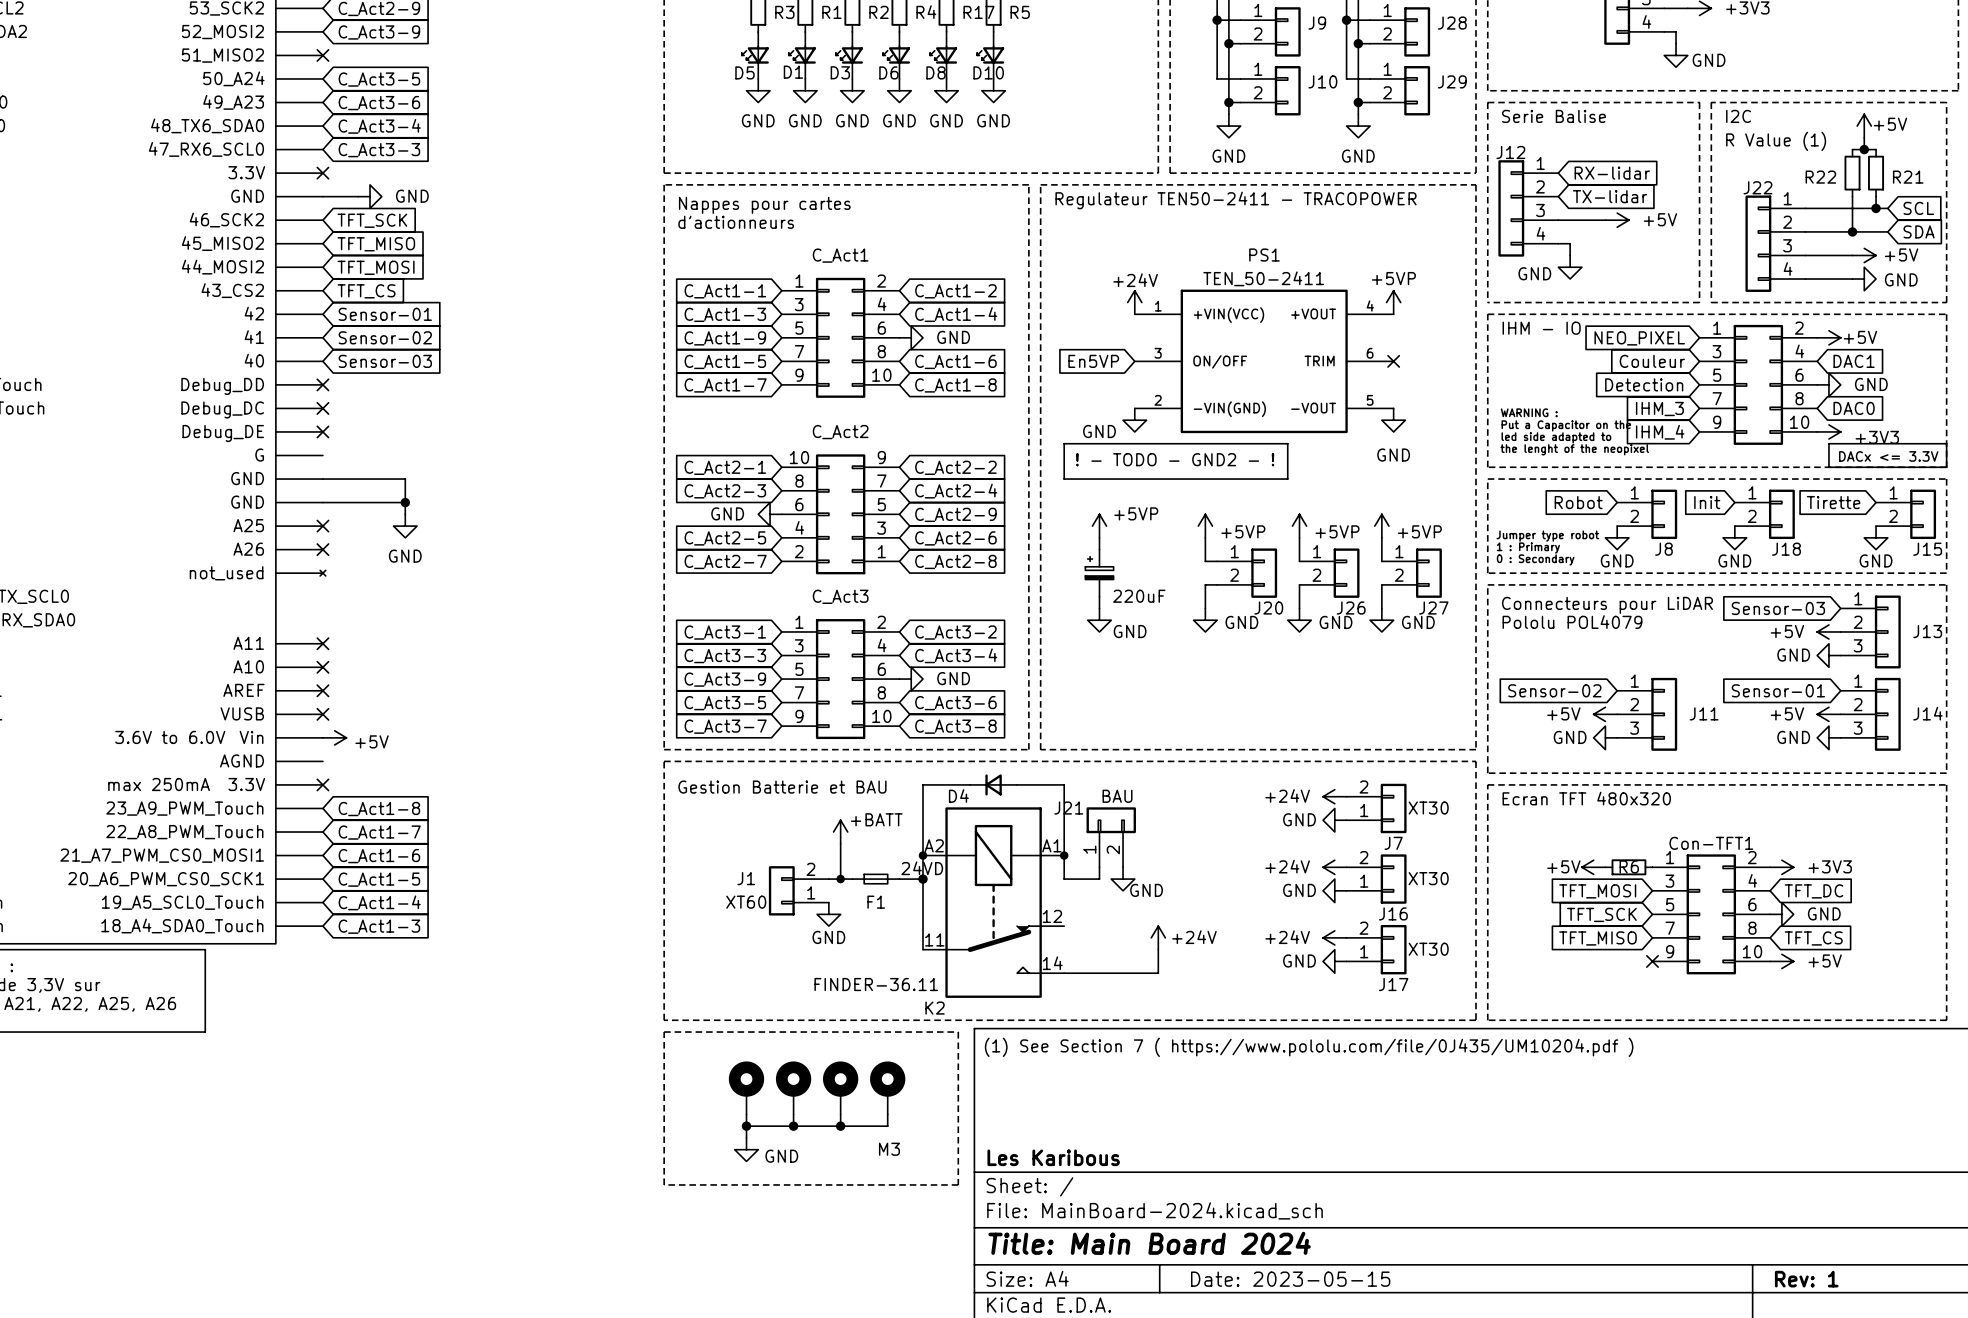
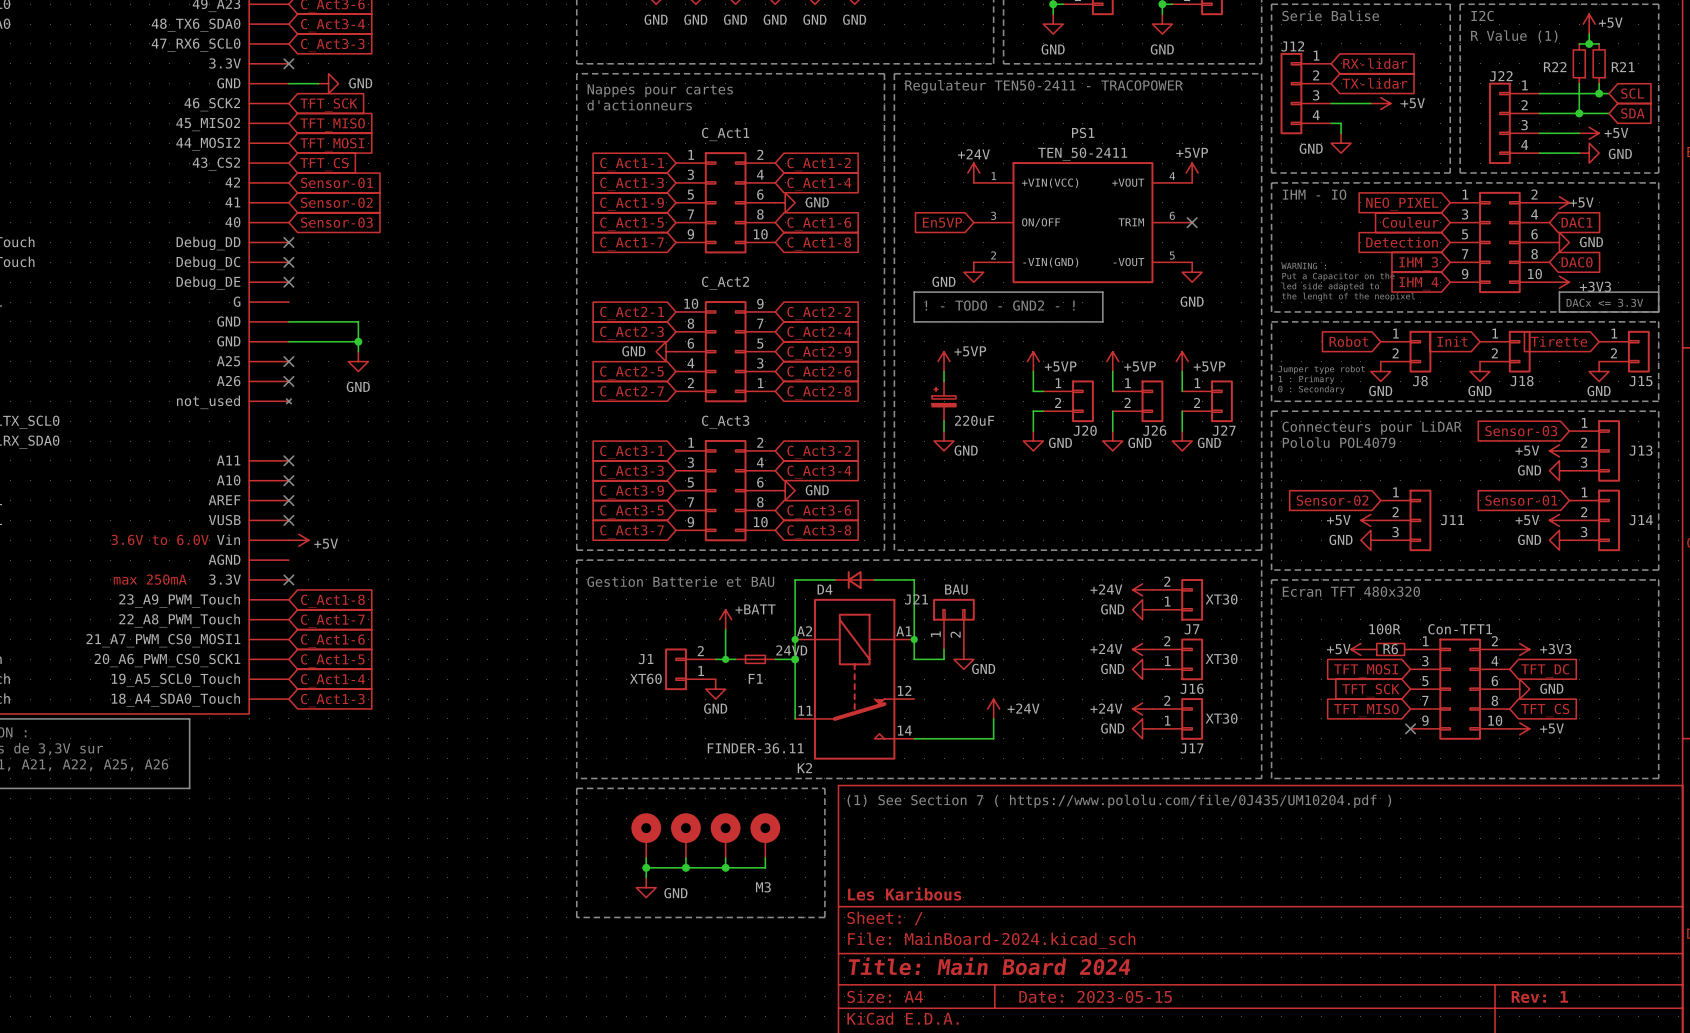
R6 value: none -> 100R (1385, 629)

